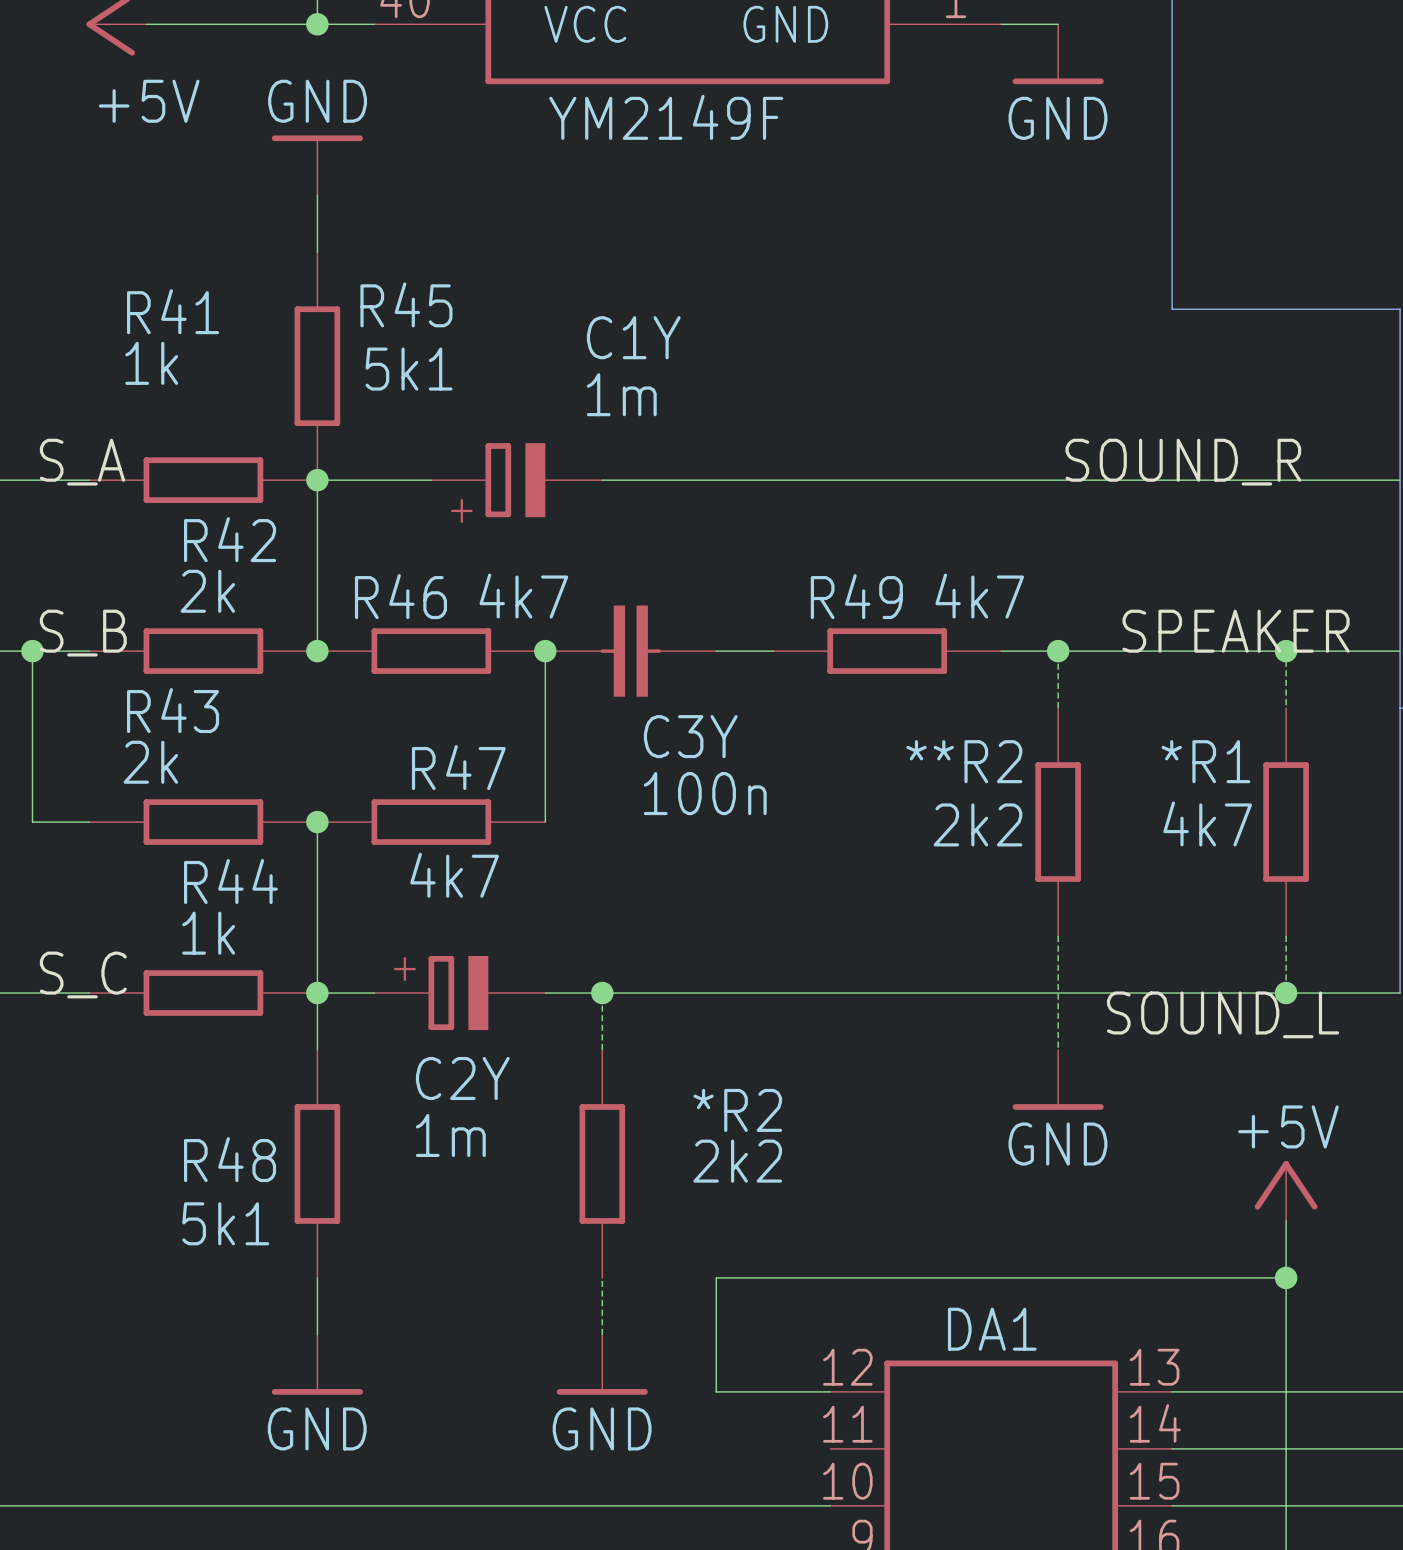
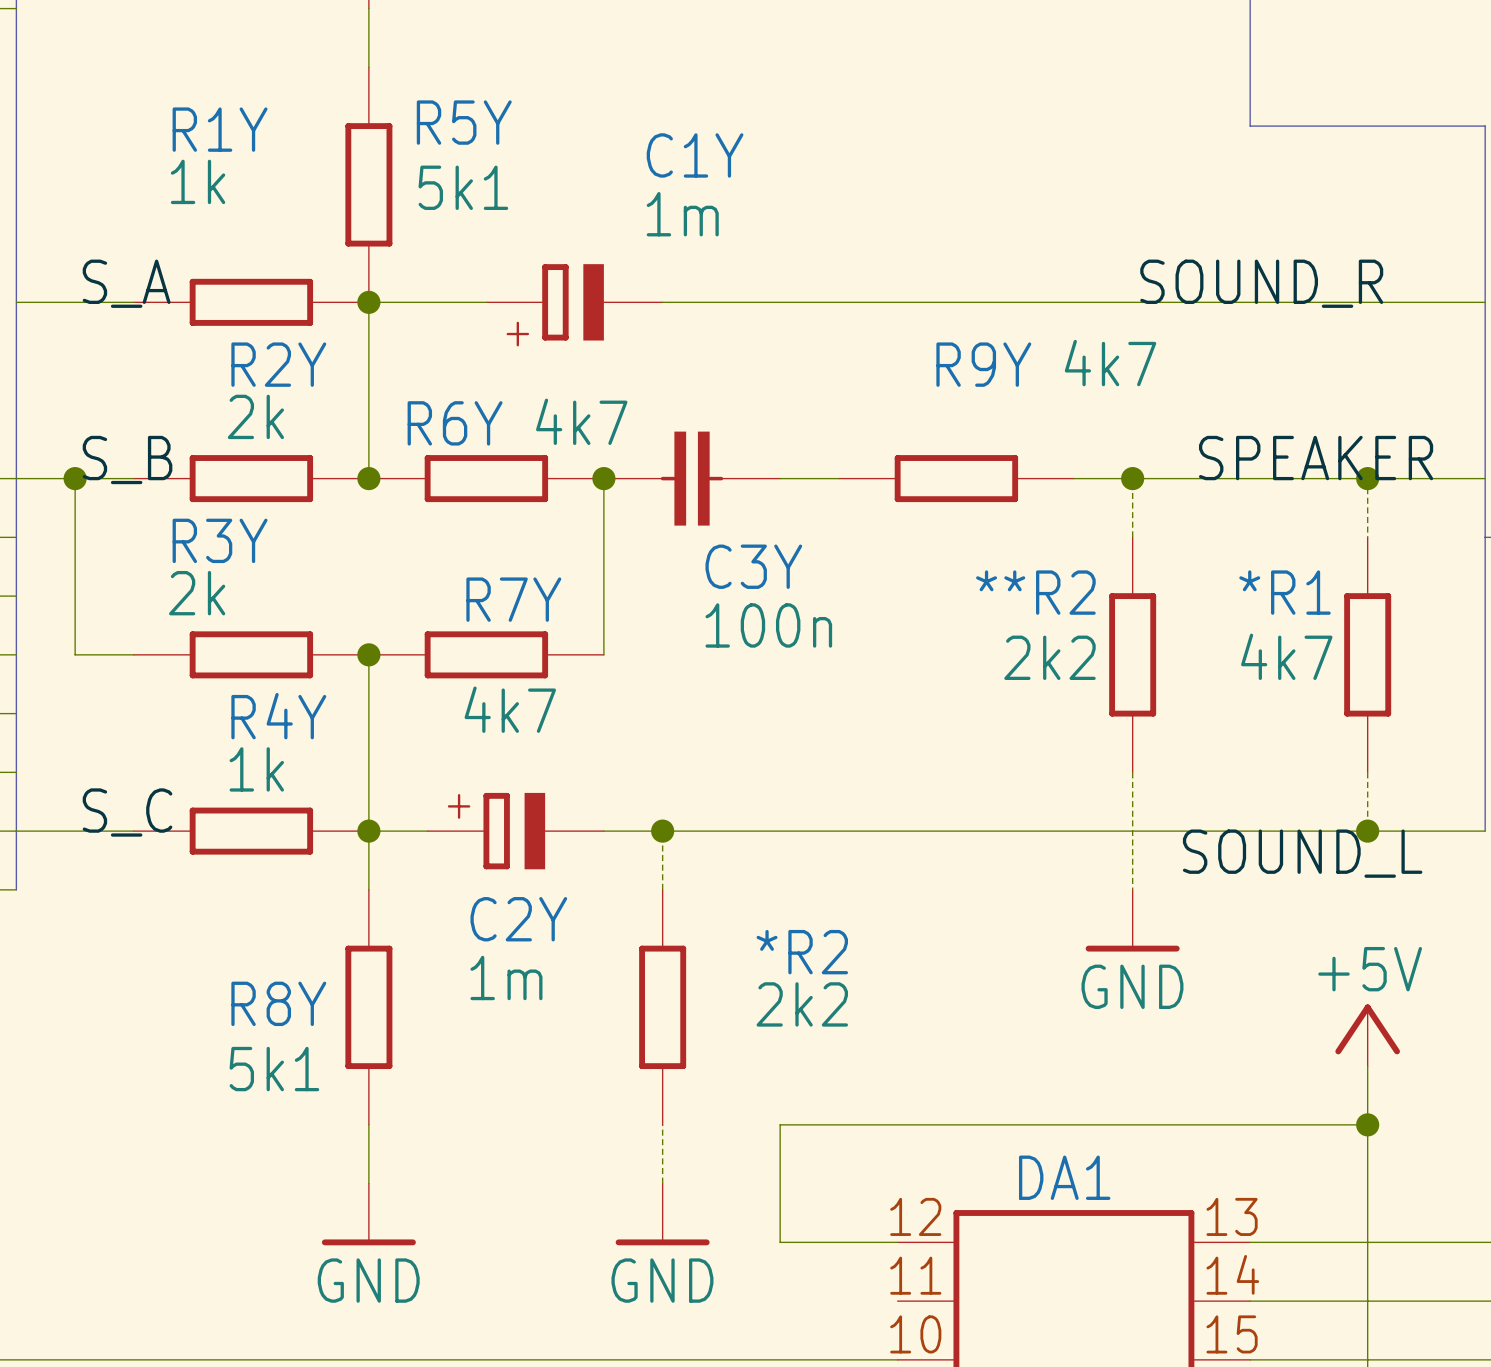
R45 name: R45 (406, 304) -> R5Y (464, 122)
R41 name: R41 (173, 311) -> R1Y (220, 129)
R42 name: R42 (230, 539) -> R2Y (278, 364)
R46 name: R46 (400, 596) -> R6Y (455, 423)
R49 name: R49 (856, 596) -> R9Y (983, 364)
R49 value position: 4k7 (979, 596) -> 4k7 (1110, 363)
R43 name: R43 (173, 710) -> R3Y (220, 540)
R47 name: R47 (458, 767) -> R7Y (513, 599)
R44 name: R44 (230, 881) -> R4Y (278, 716)
R48 name: R48 (230, 1159) -> R8Y (278, 1003)

